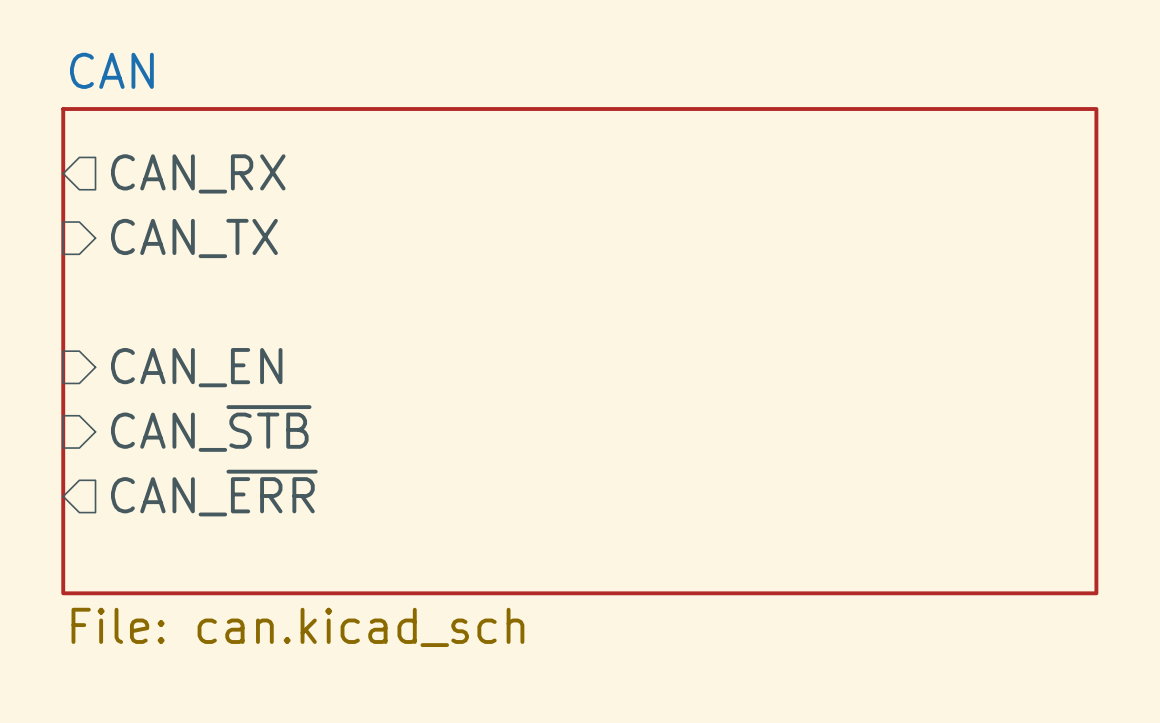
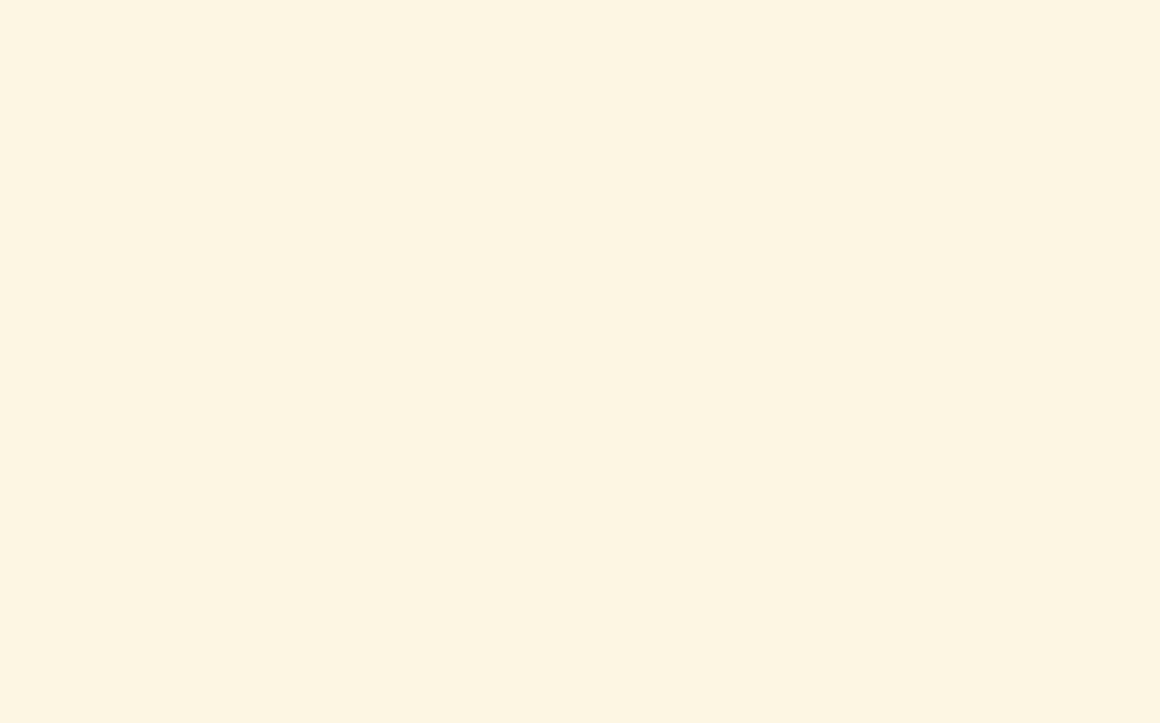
sheet pin: CAN_RX (198, 173) -> none
sheet pin: CAN_TX (194, 238) -> none
sheet CAN: File: can.kicad_sch (579, 351) -> none
sheet pin: CAN_EN (196, 367) -> none
sheet pin: CAN_~{STB} (211, 428) -> none
sheet pin: CAN_~{ERR} (214, 493) -> none

